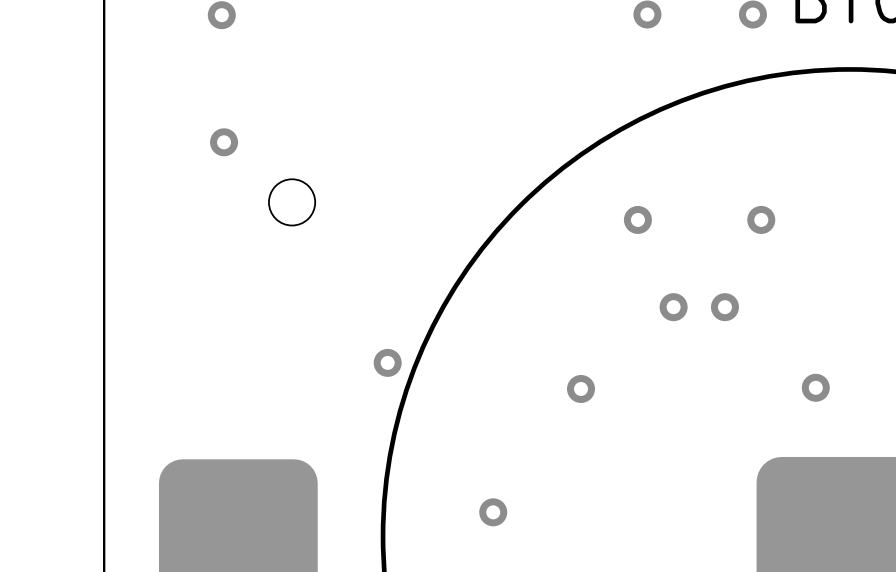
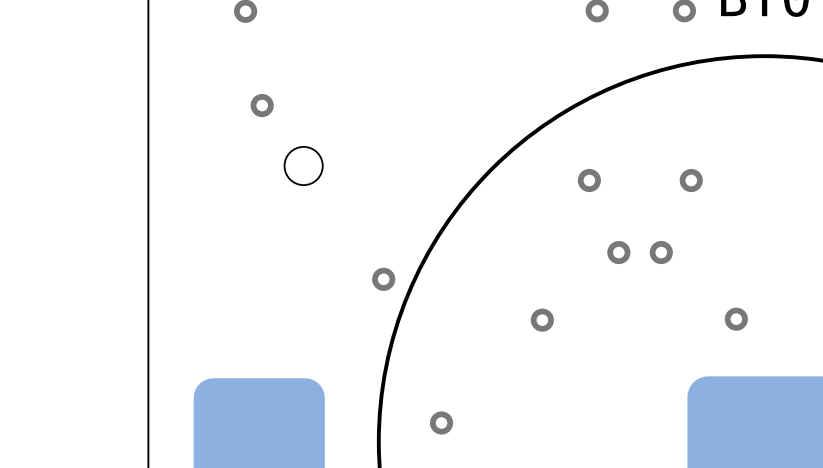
via position: (224, 142) -> (262, 105)
via position: (387, 362) -> (383, 279)
via position: (493, 512) -> (441, 423)

